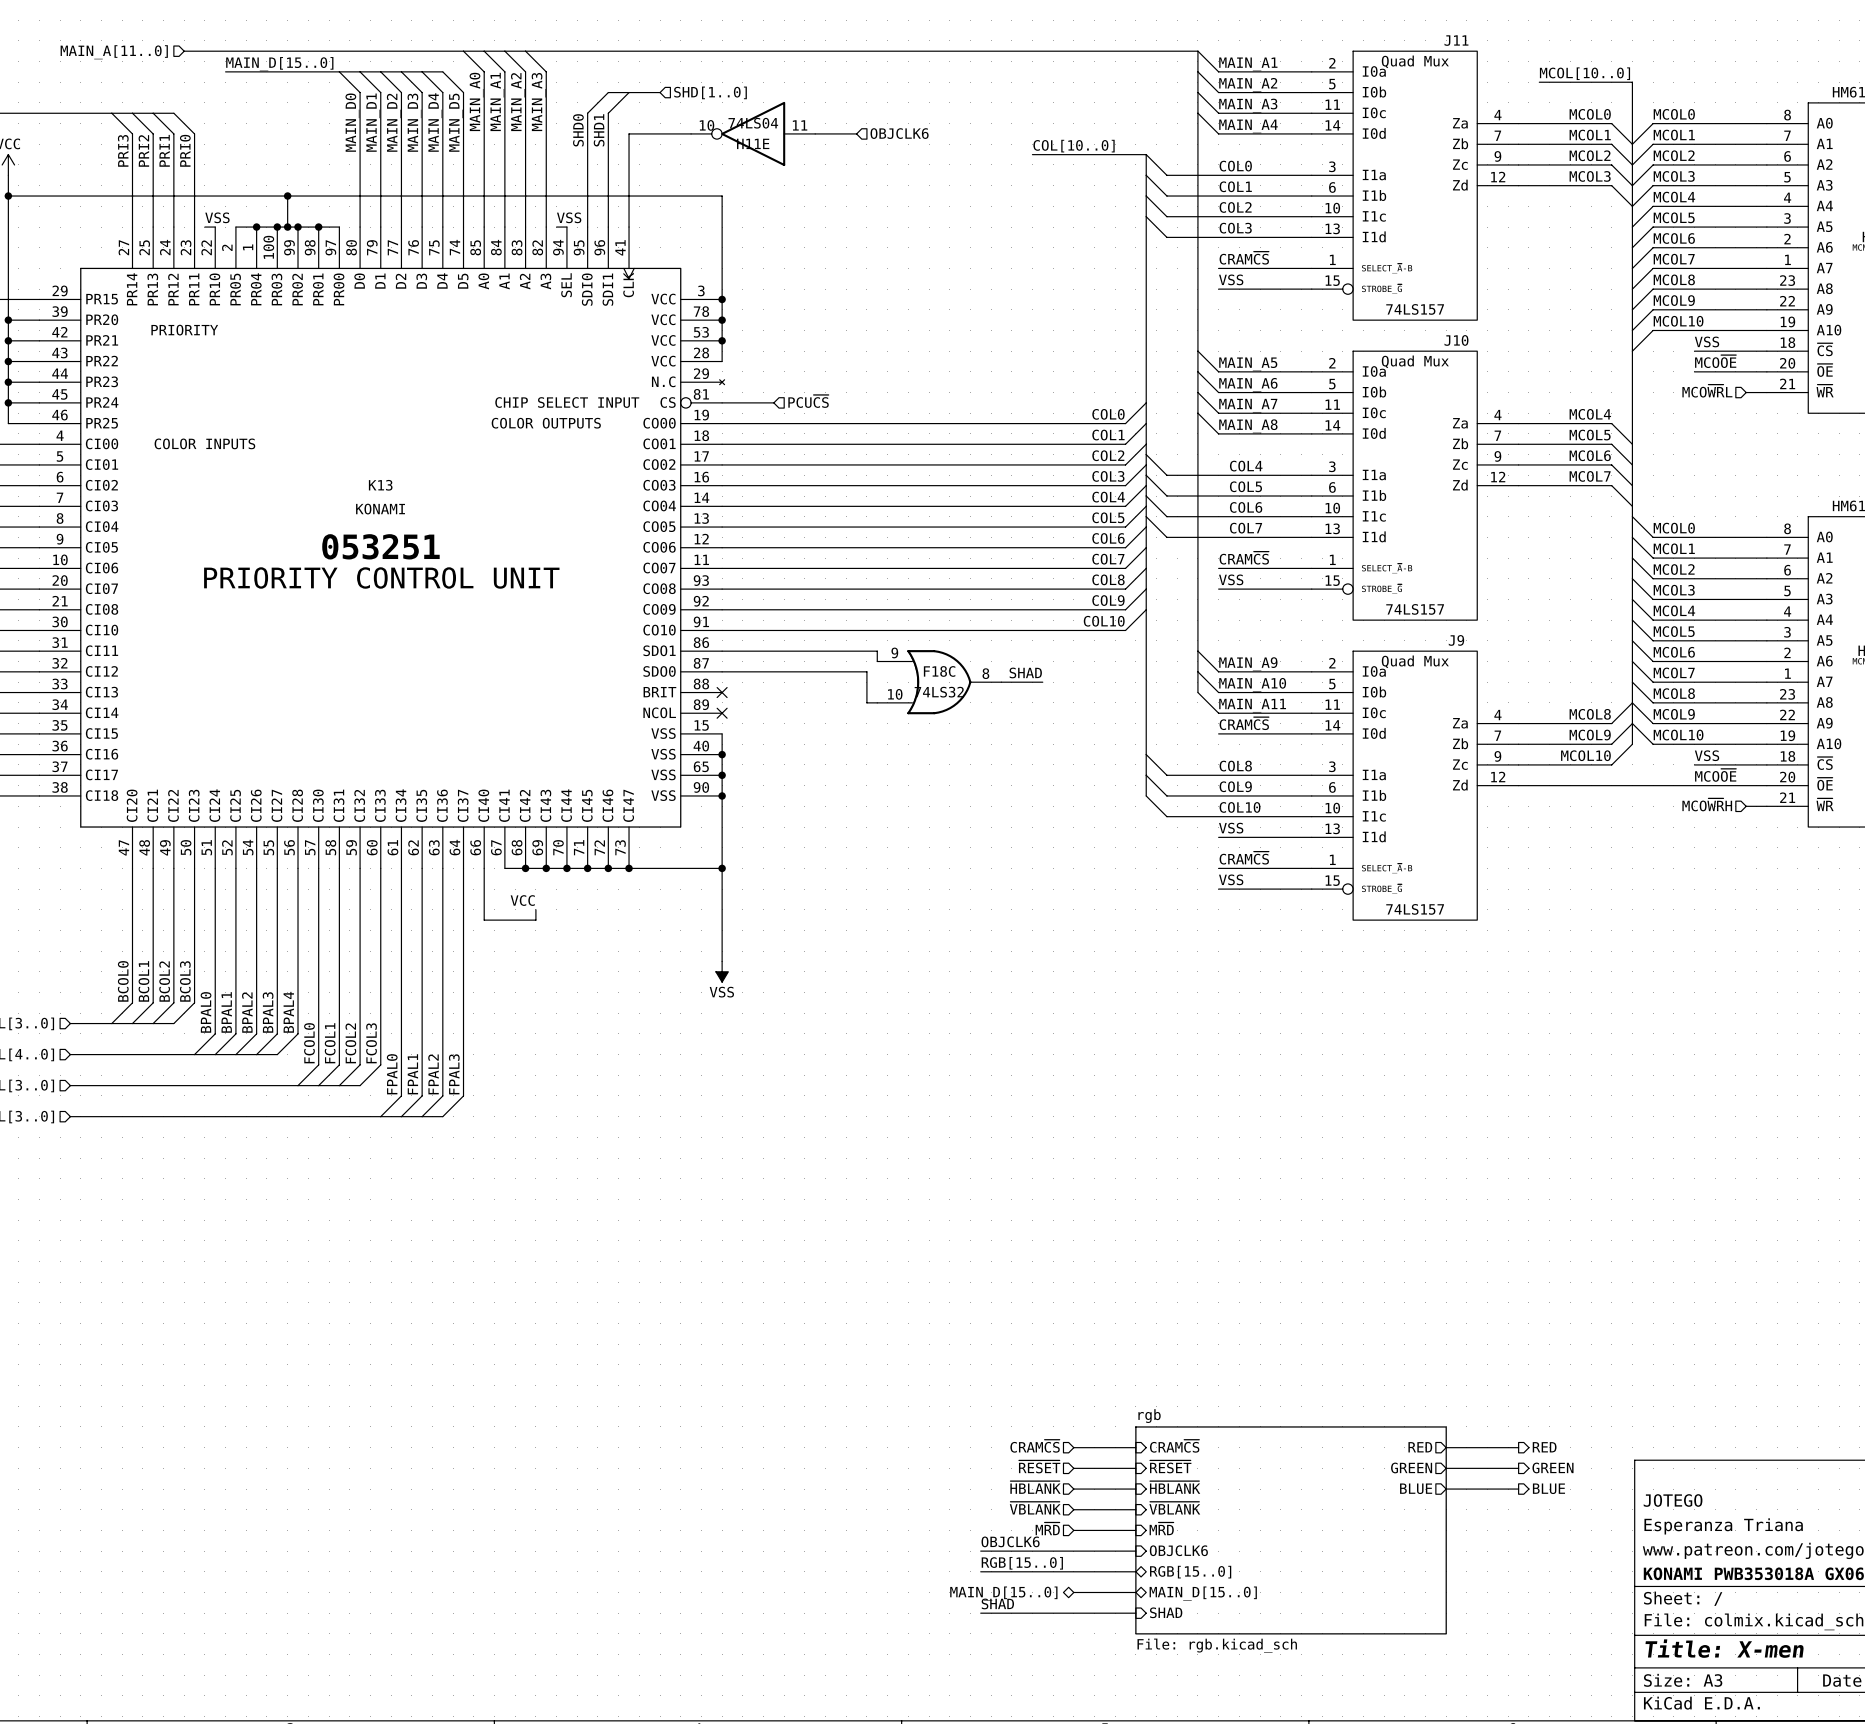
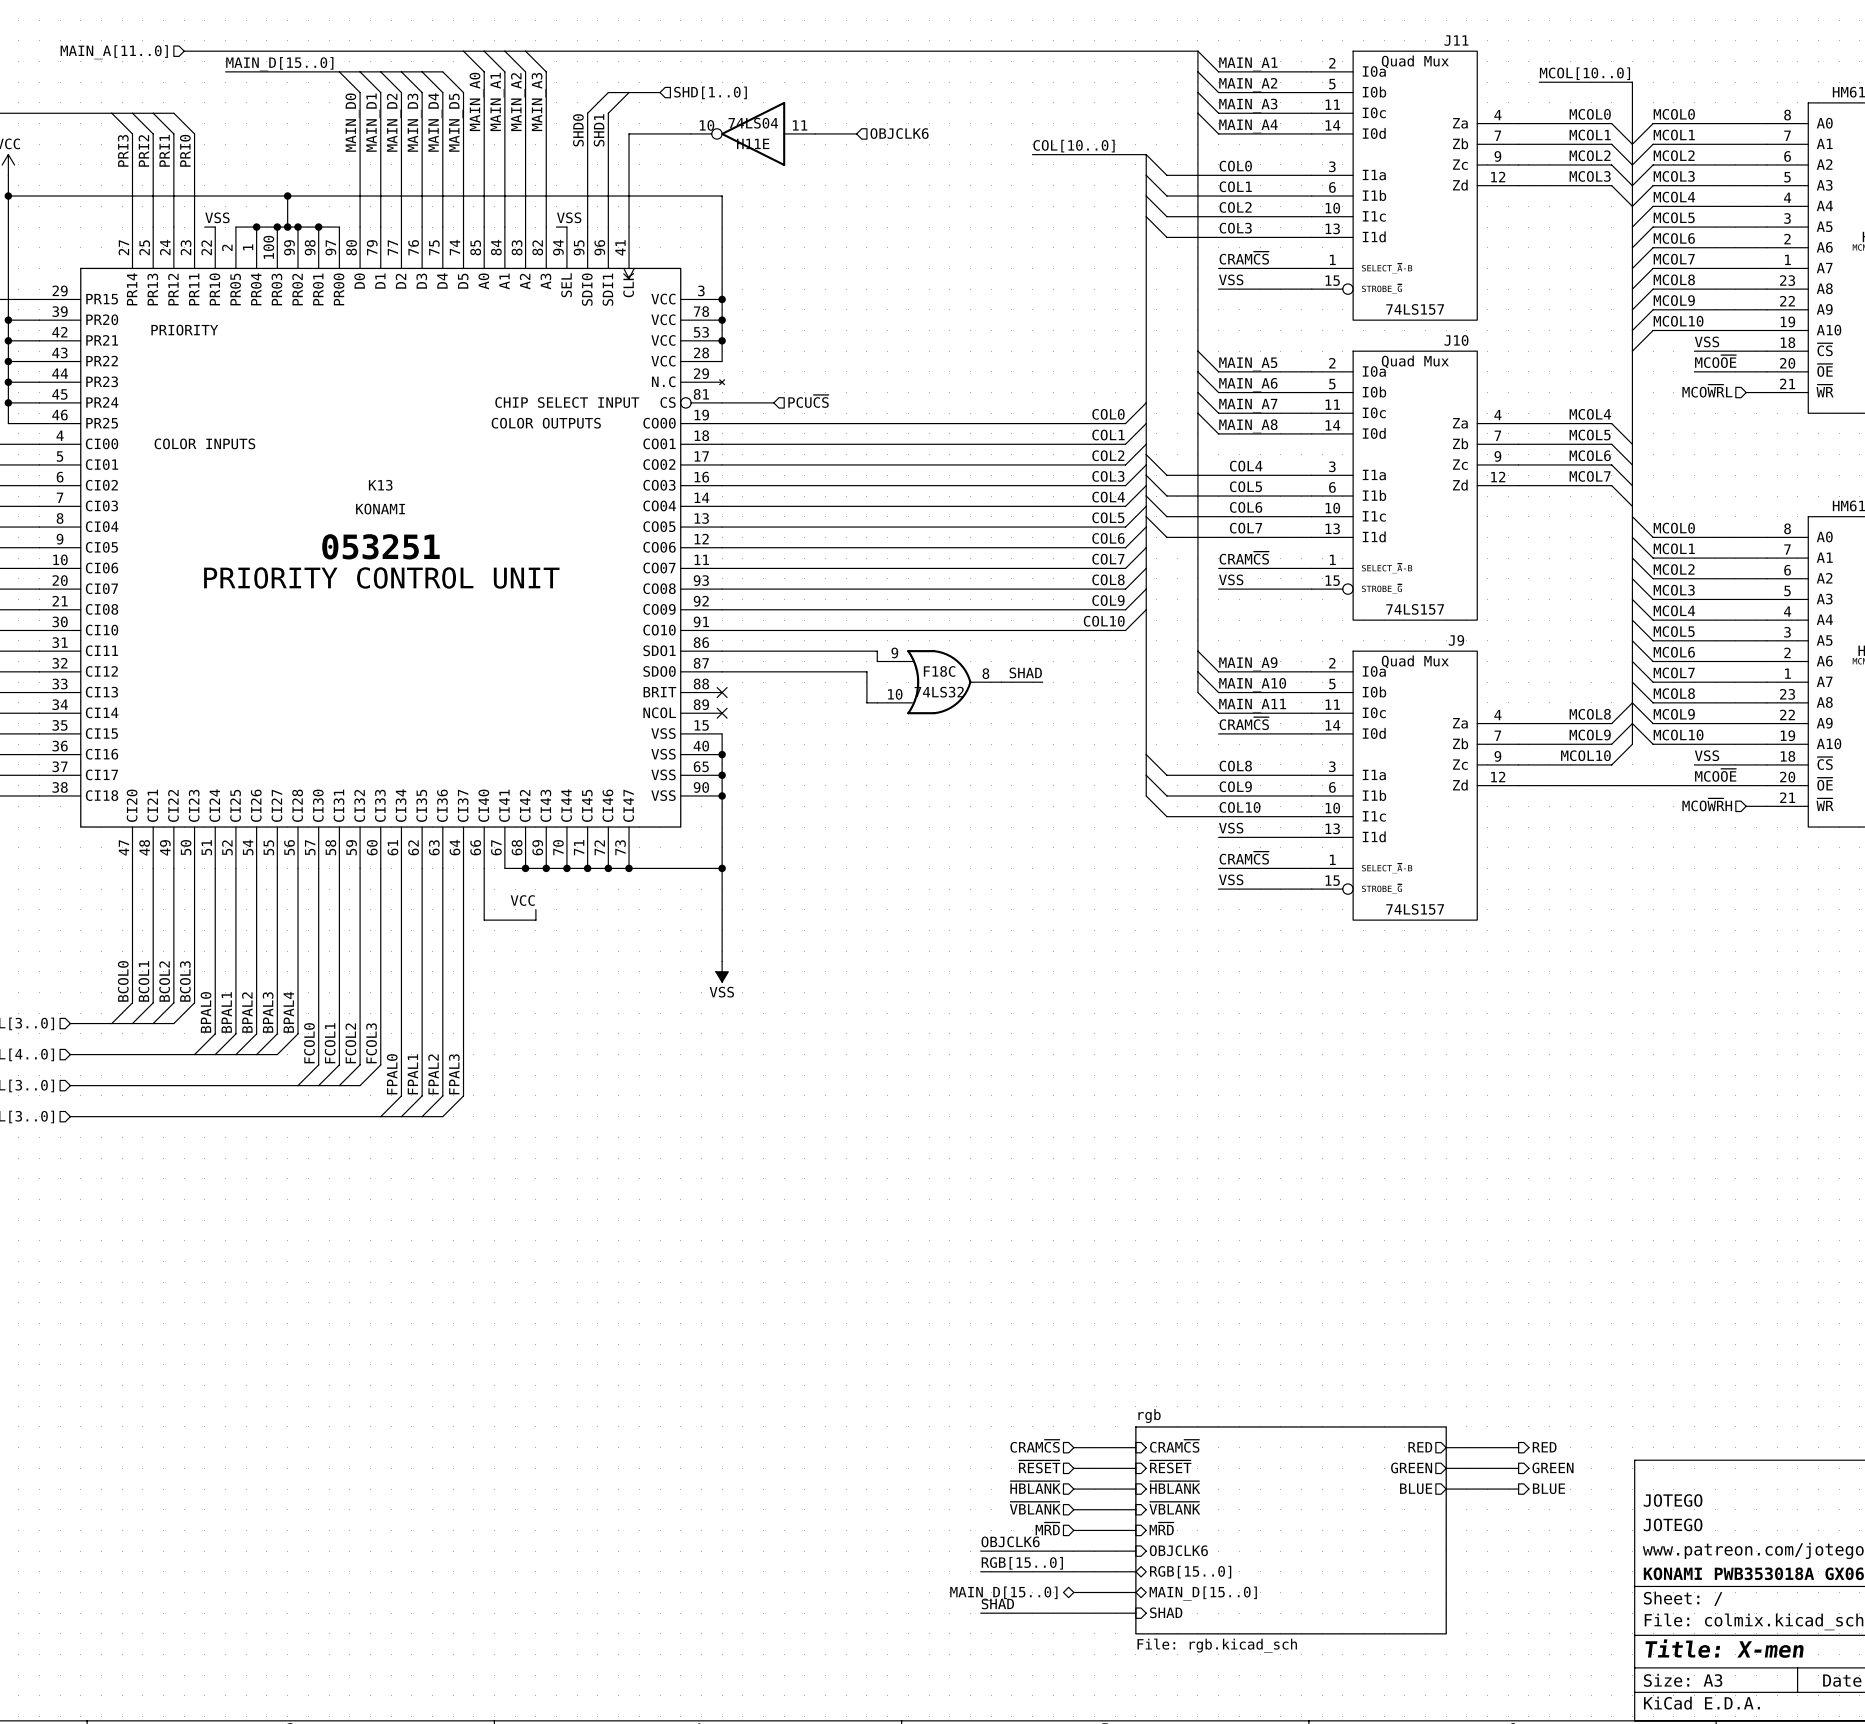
title block: Esperanza Triana (1723, 1526) -> JOTEGO (1673, 1524)

